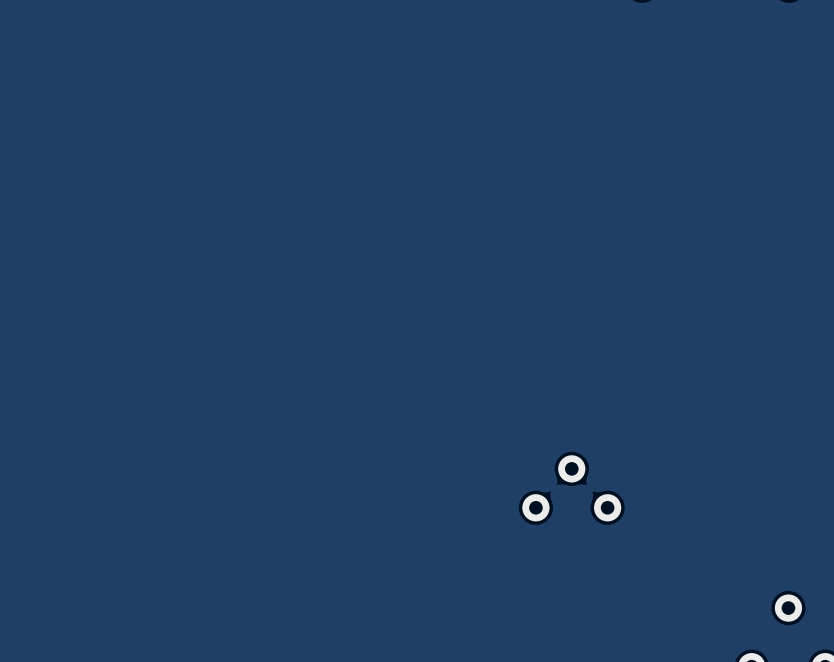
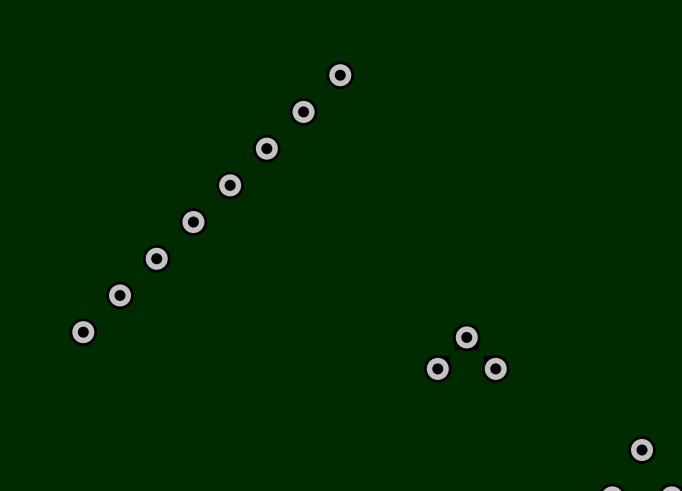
via: none -> (340, 75)
via: none -> (303, 111)
via: none -> (266, 148)
via: none -> (230, 185)
via: none -> (193, 222)
via: none -> (156, 258)
via: none -> (120, 295)
via: none -> (83, 332)

